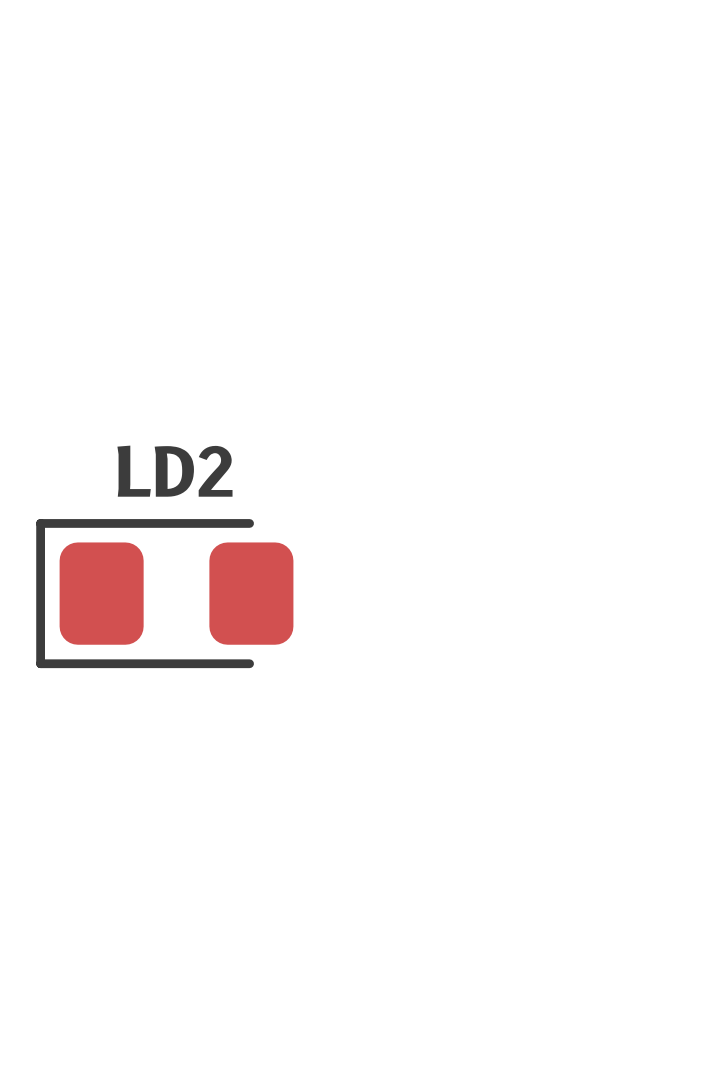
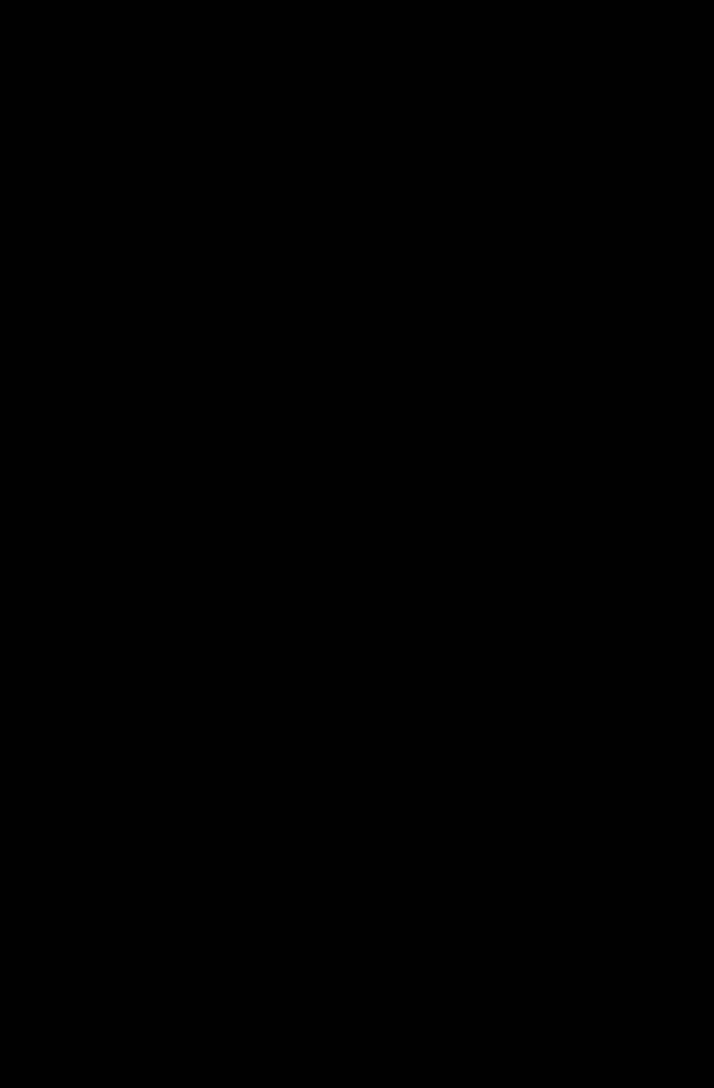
LD2: (164, 593) -> none

